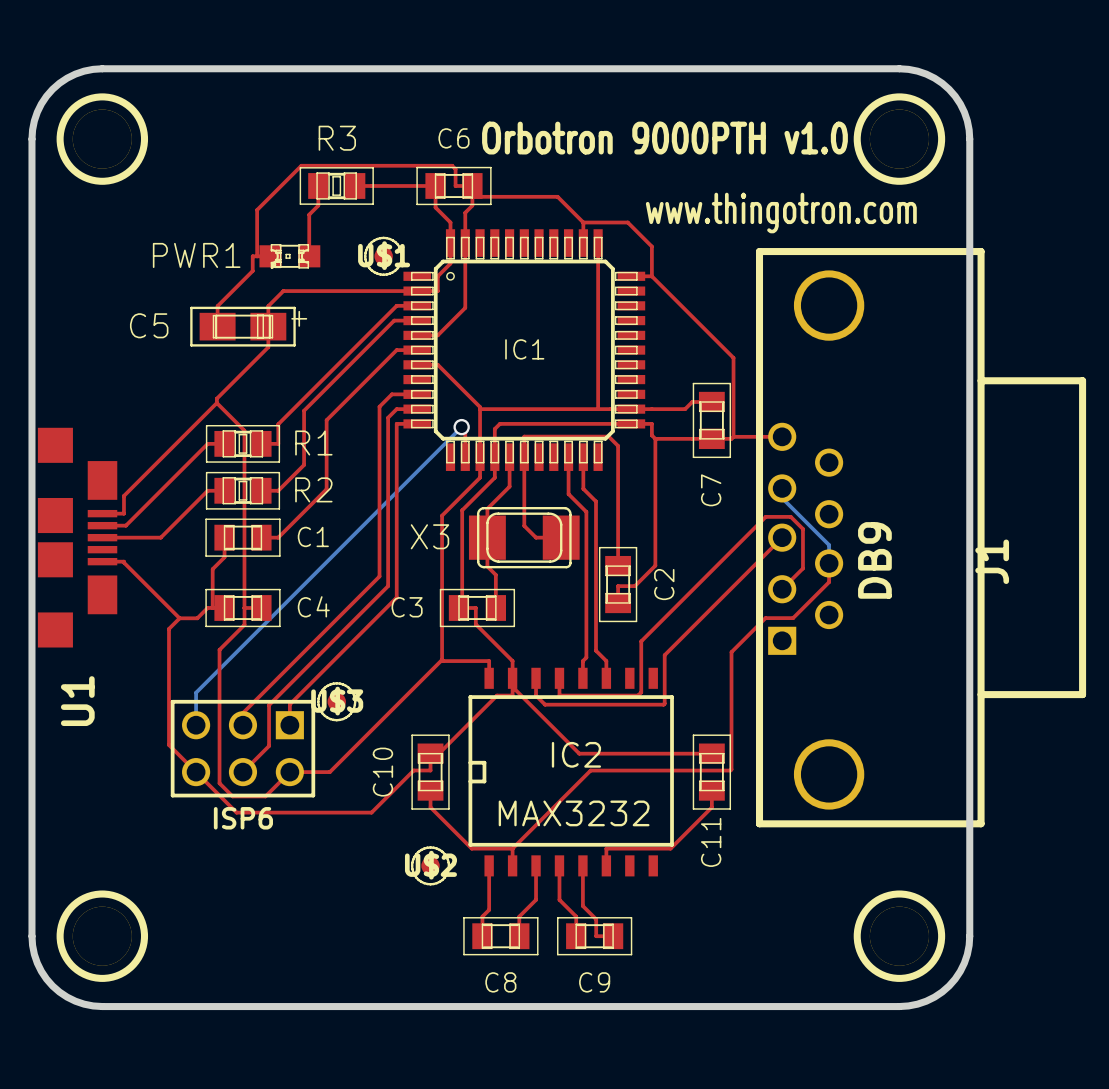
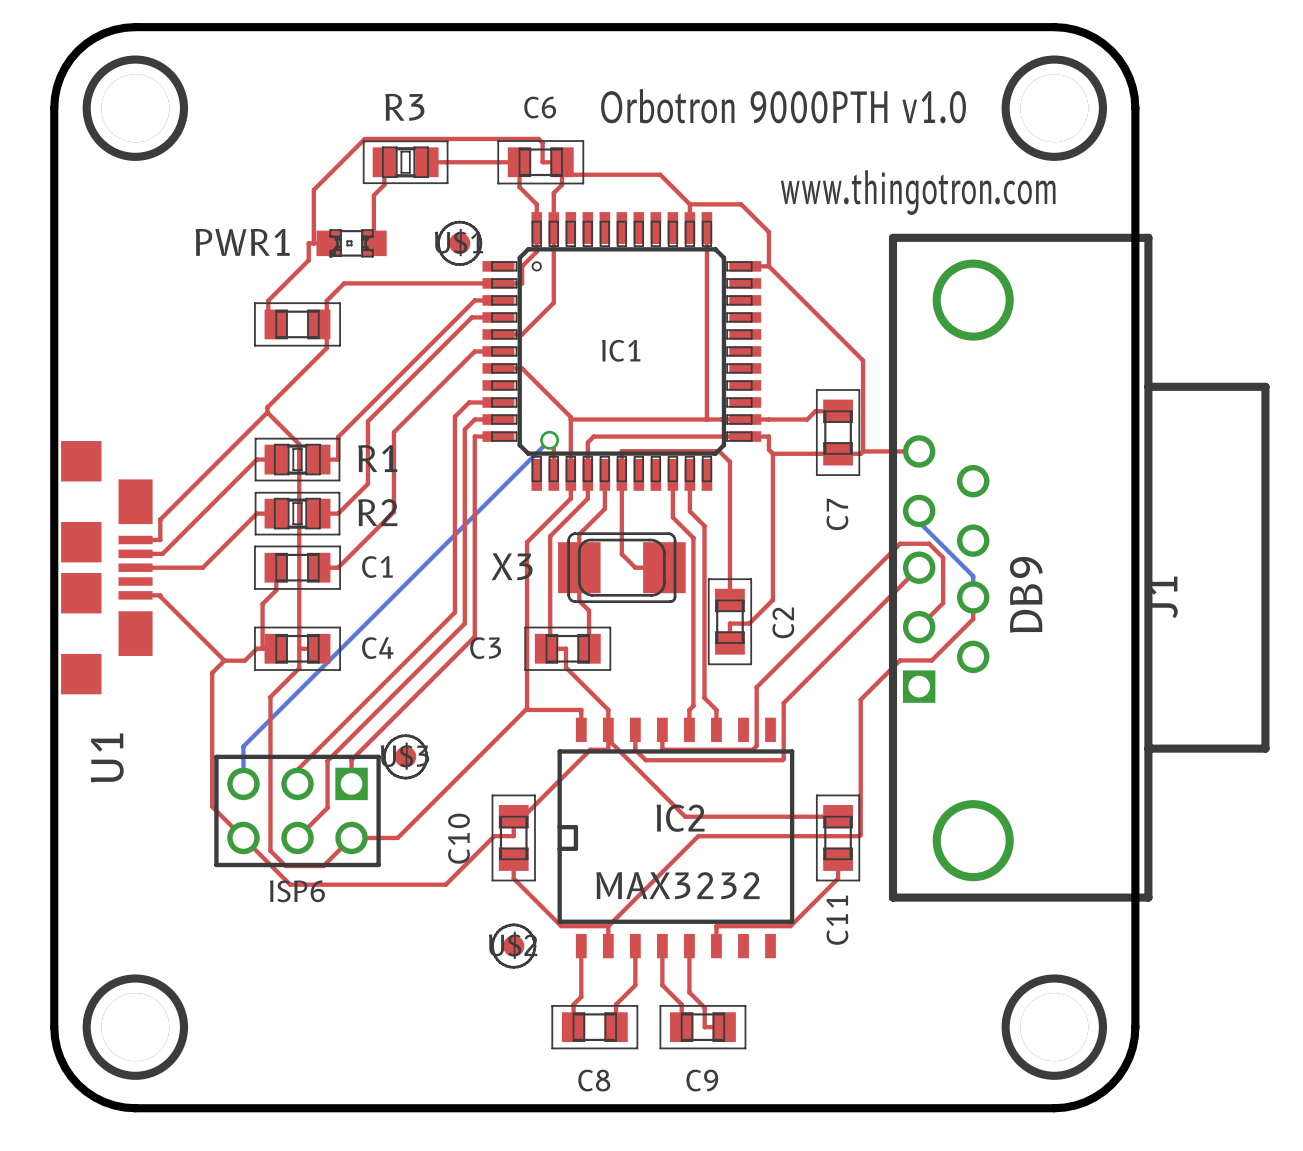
C5: (242, 326) -> none
part: none -> (297, 324)

